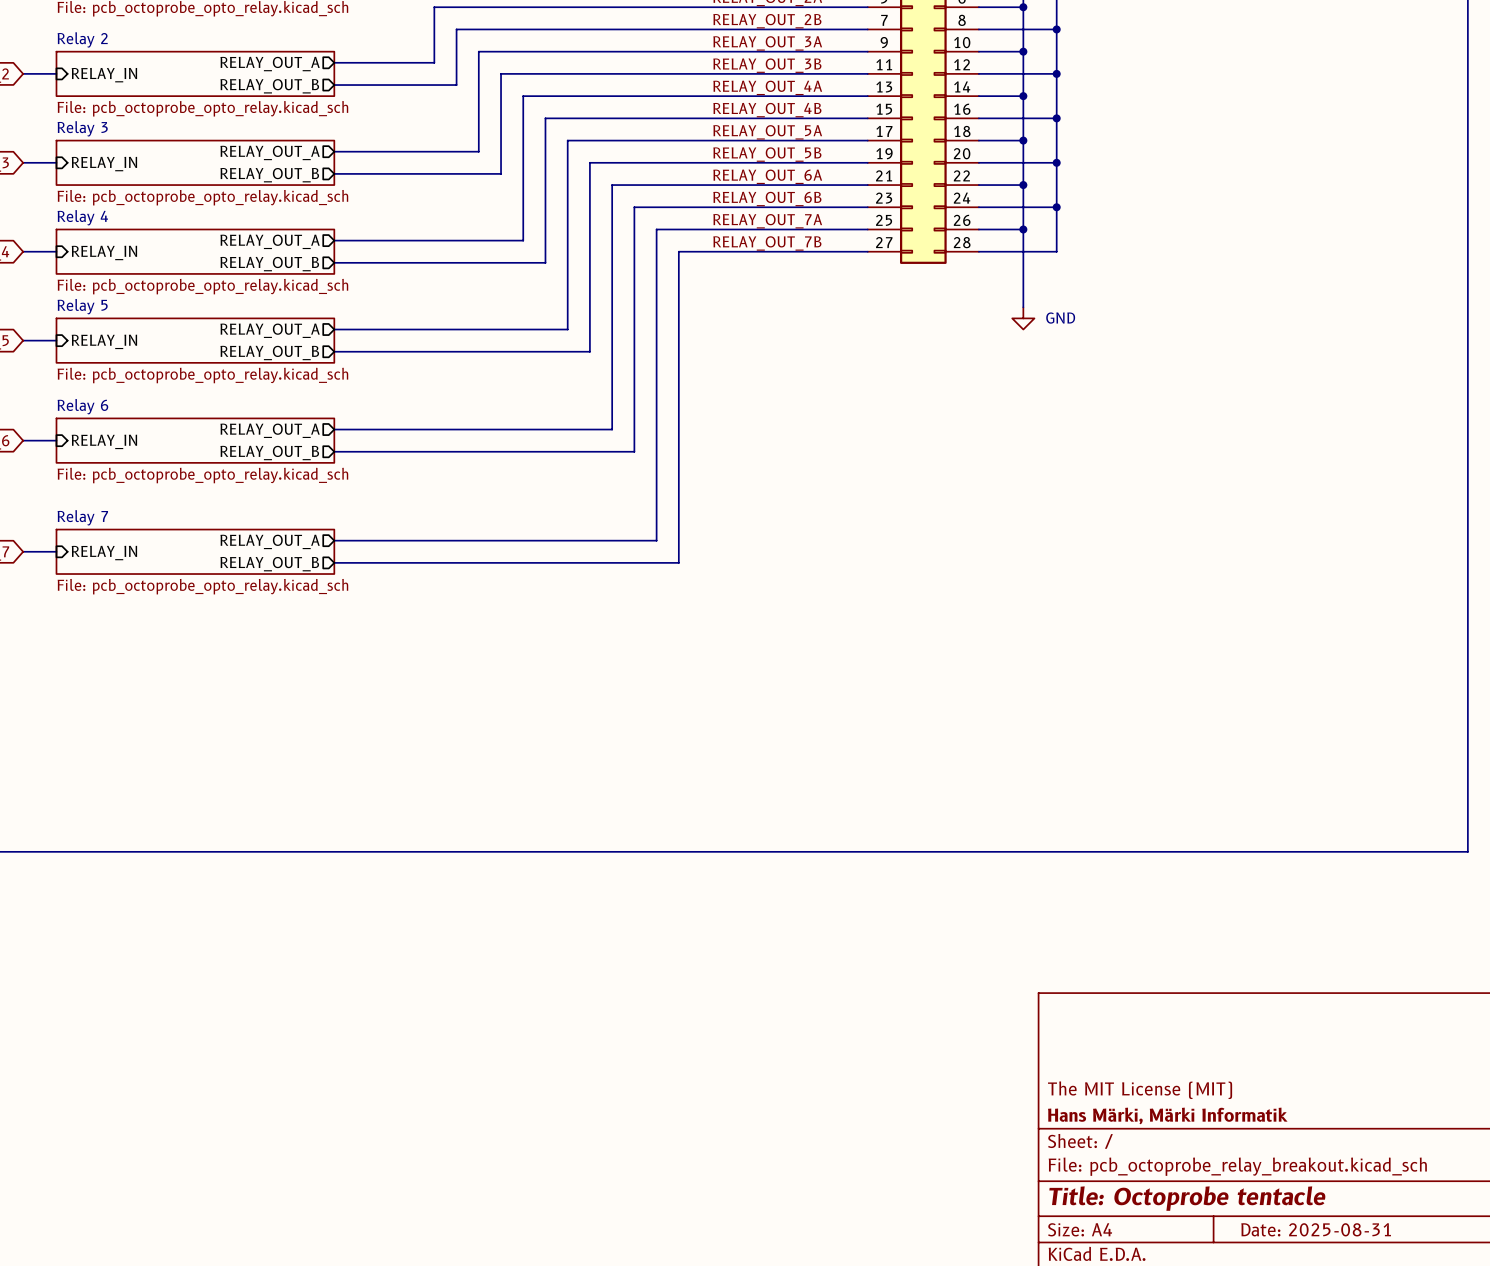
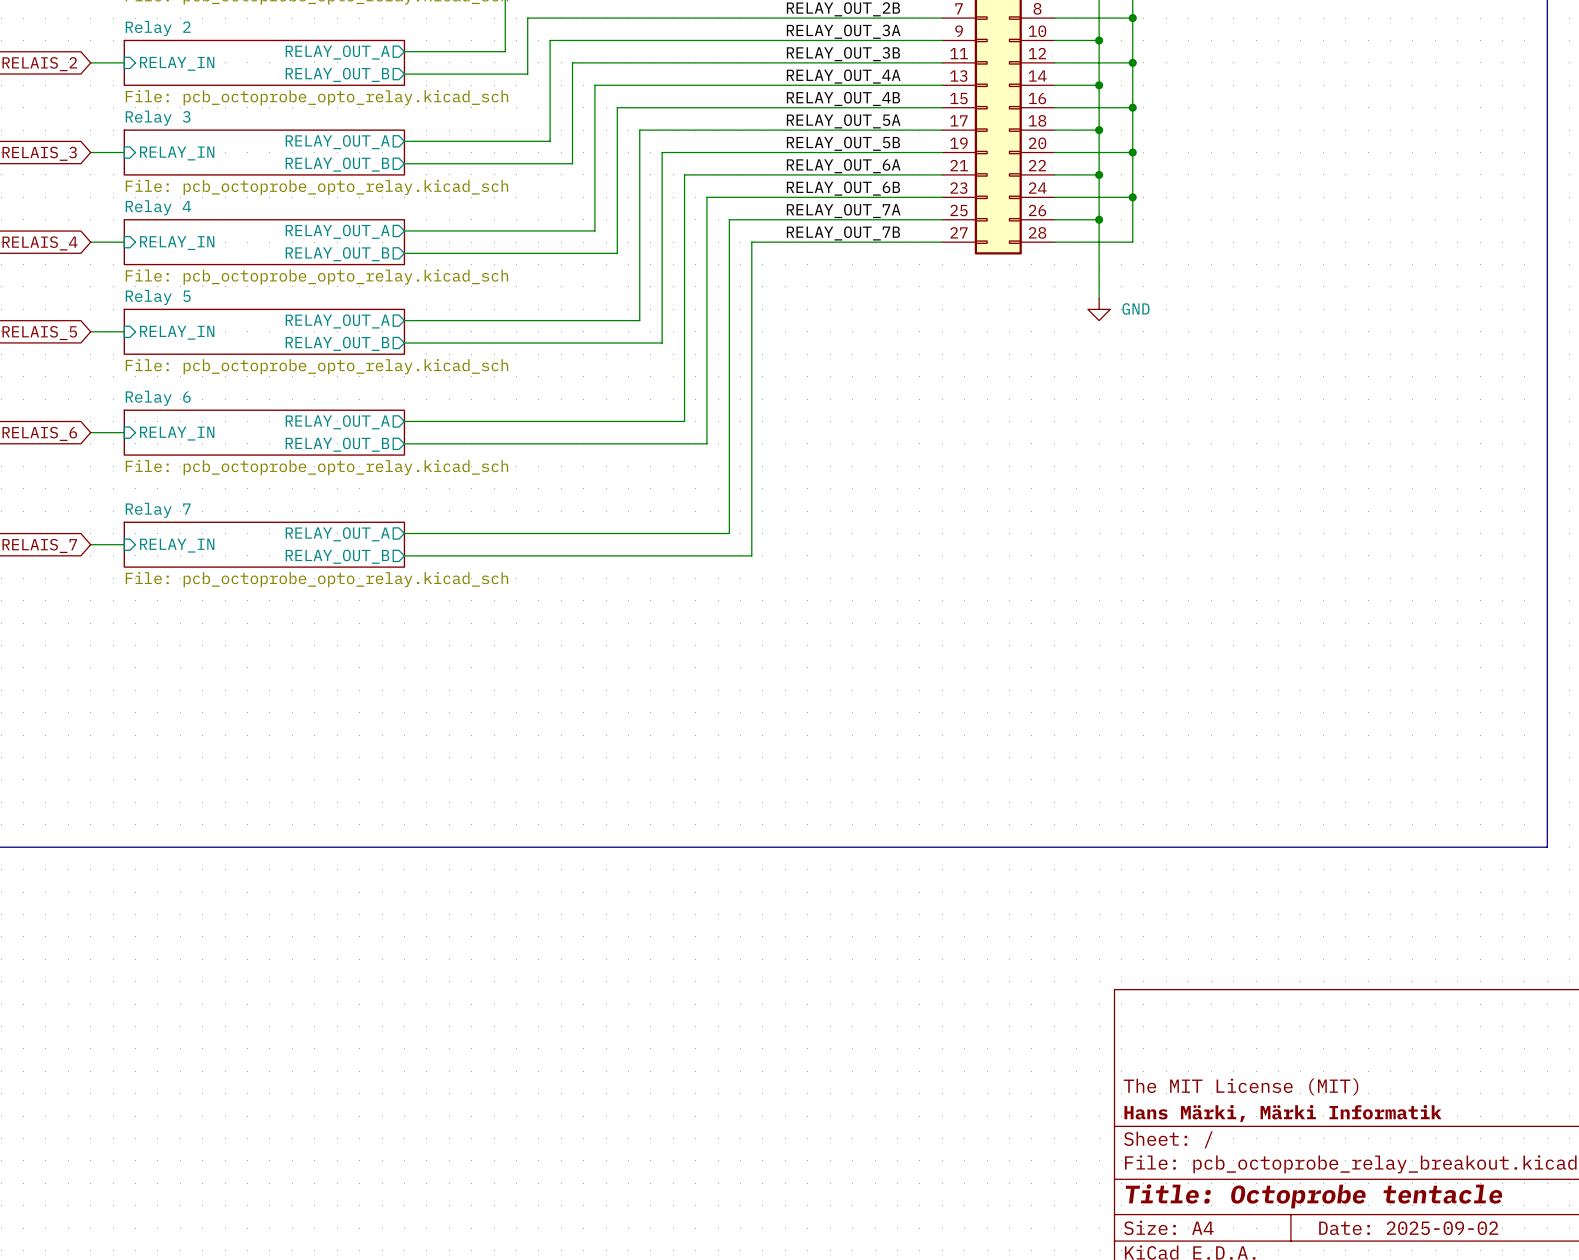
title block: Date: 2025-08-31 (1316, 1229) -> Date: 2025-09-02 (1408, 1228)

